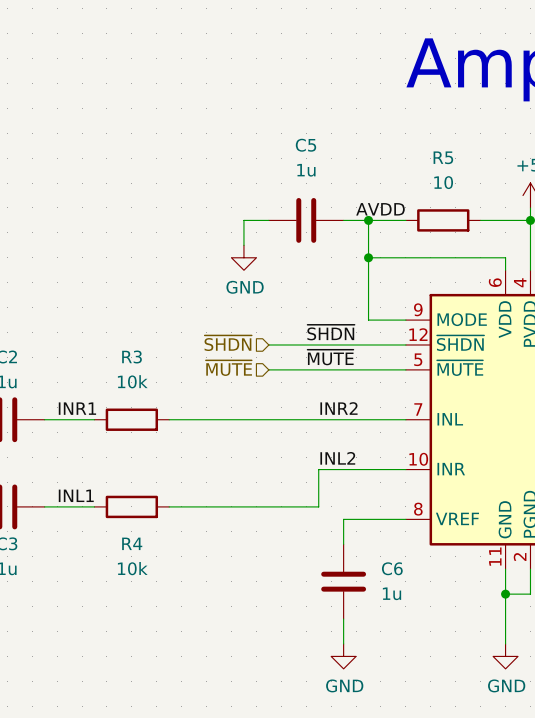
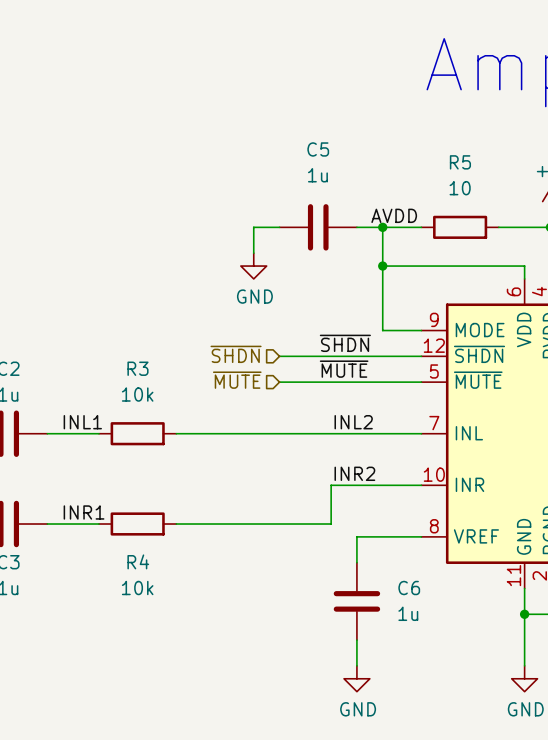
label: INR1 (77, 408) -> INL1 (82, 422)
label: INR2 (338, 408) -> INL2 (353, 422)
label: INL2 (337, 458) -> INR2 (354, 473)
label: INL1 (76, 495) -> INR1 (84, 512)

